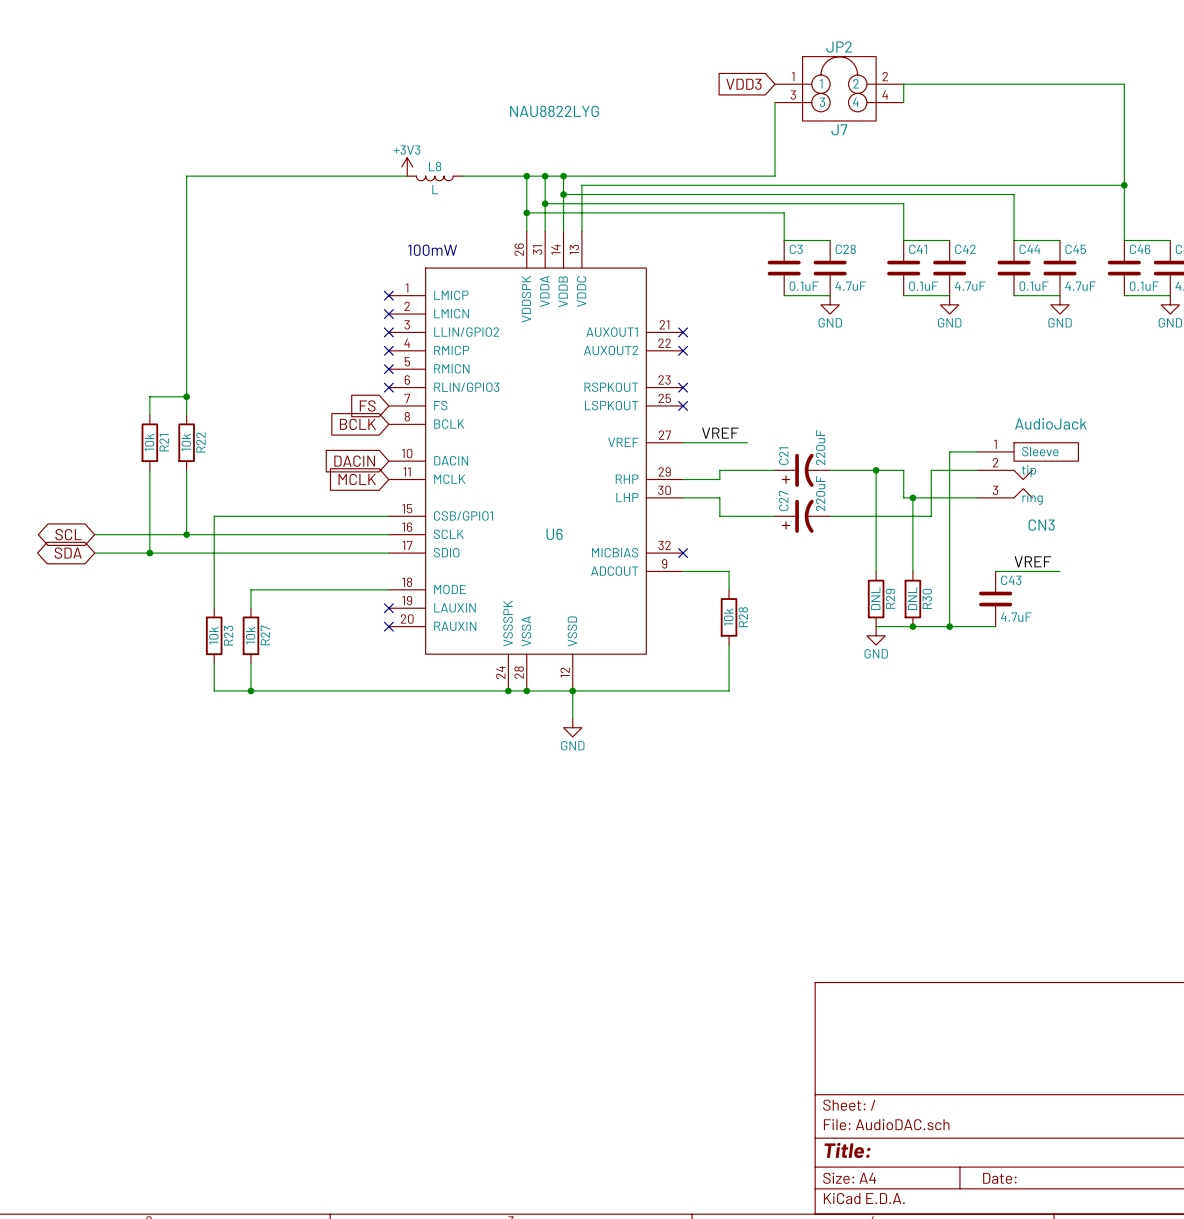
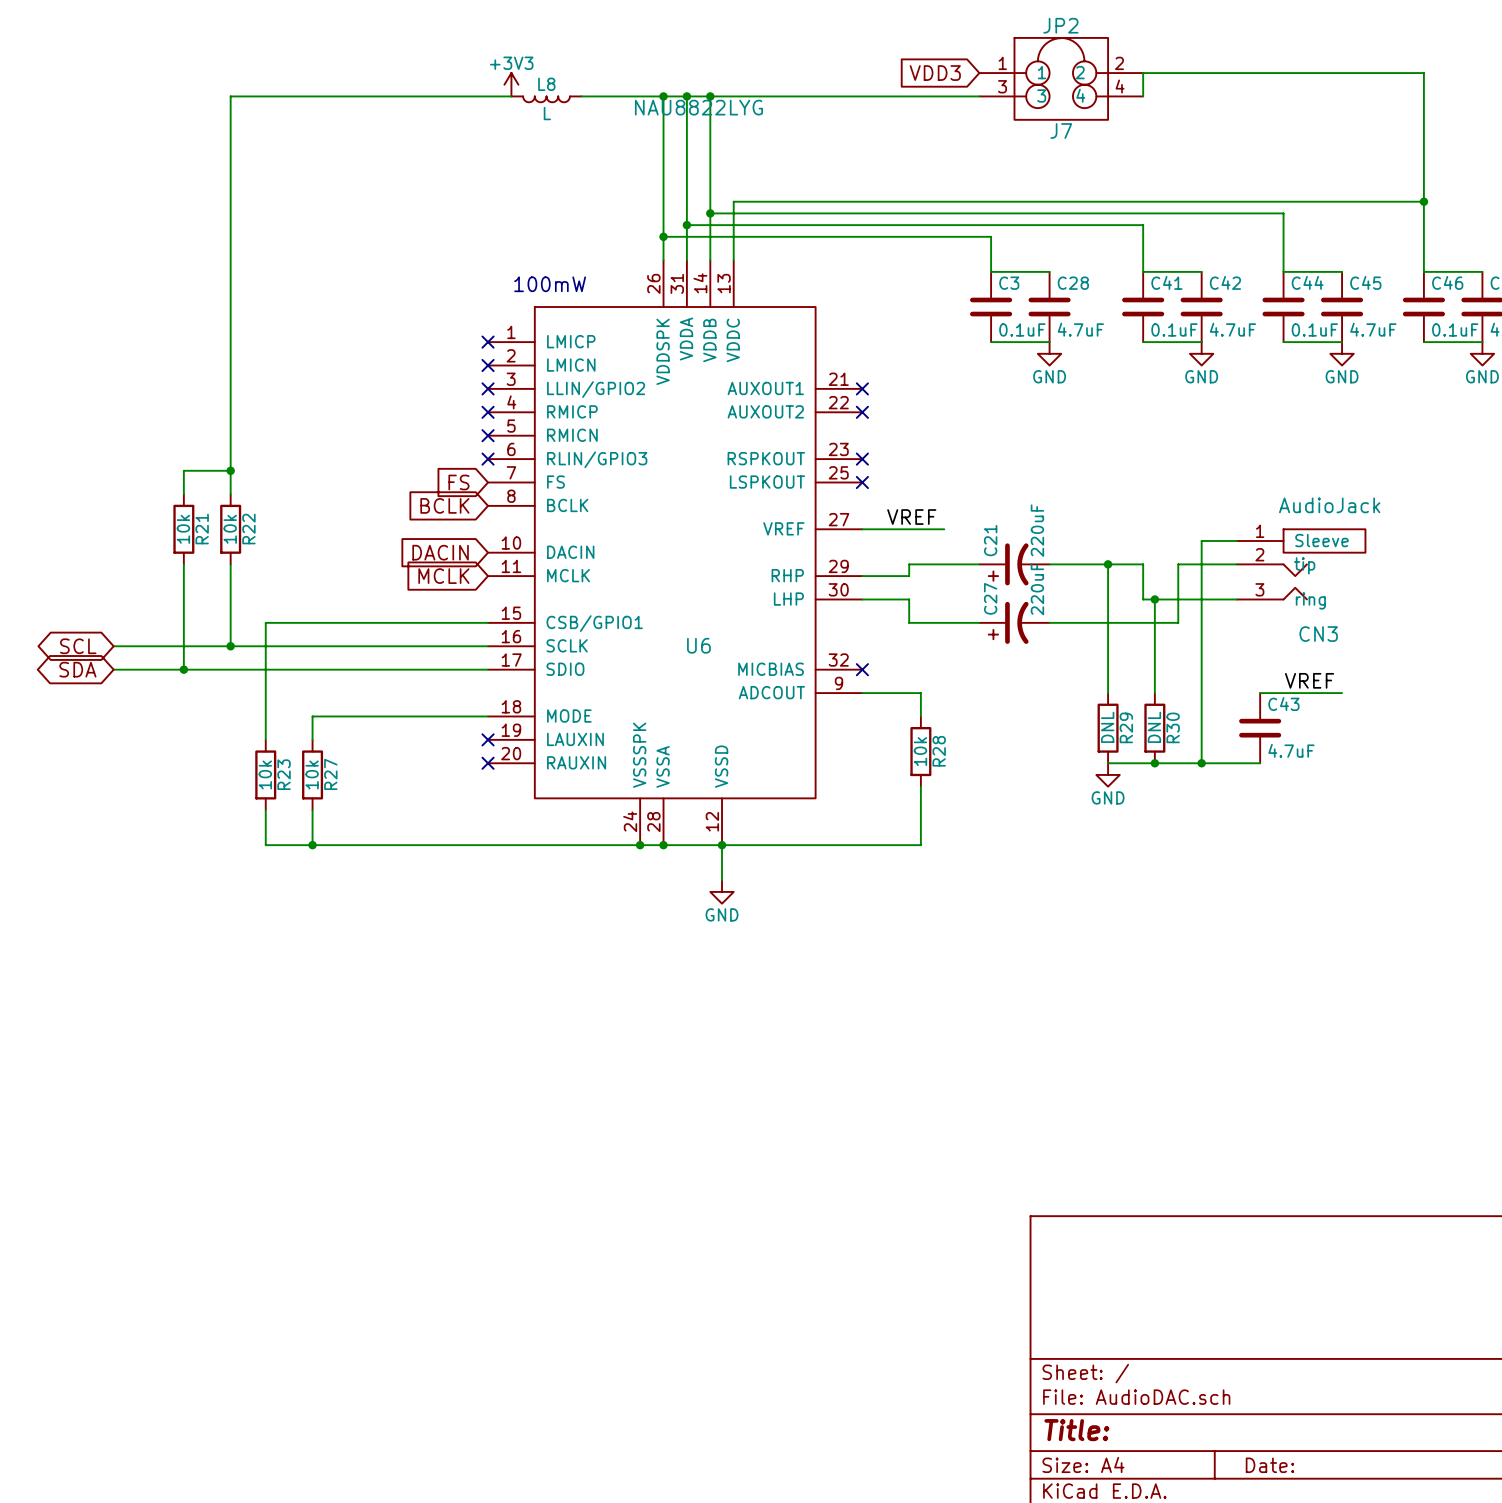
wire: none -> (663, 96) (663, 190)
junction: none -> (663, 96)
wire: none -> (686, 96) (686, 190)
junction: none -> (686, 96)
wire: none -> (710, 96) (710, 190)
junction: none -> (710, 96)
wire: (774, 102) (774, 176) (462, 176) -> (979, 96) (581, 96)
power symbol position: +3V3 (407, 166) -> +3V3 (511, 84)
wire: (186, 176) (407, 176) -> (230, 190) (230, 96) (511, 96)
junction: (526, 176) -> none
junction: (545, 176) -> none
junction: (563, 176) -> none
L8 position: (434, 178) -> (546, 99)

